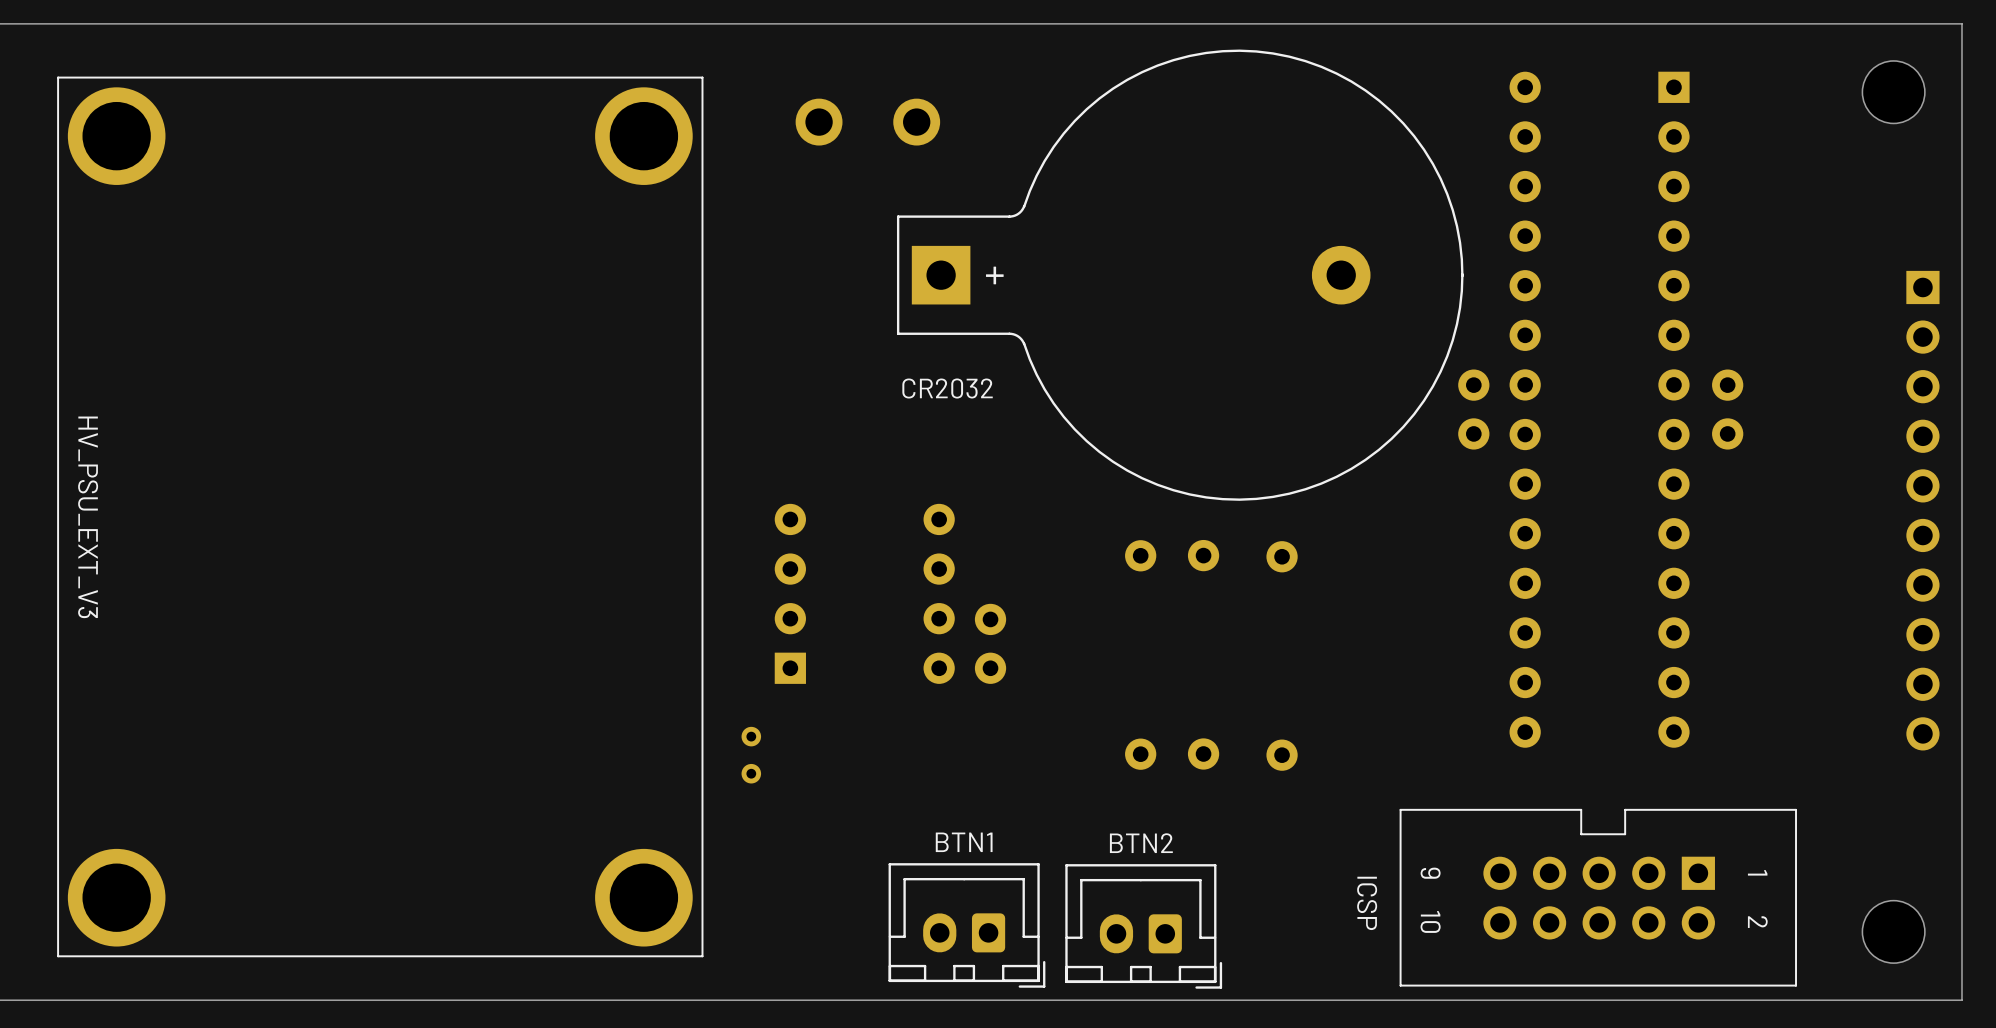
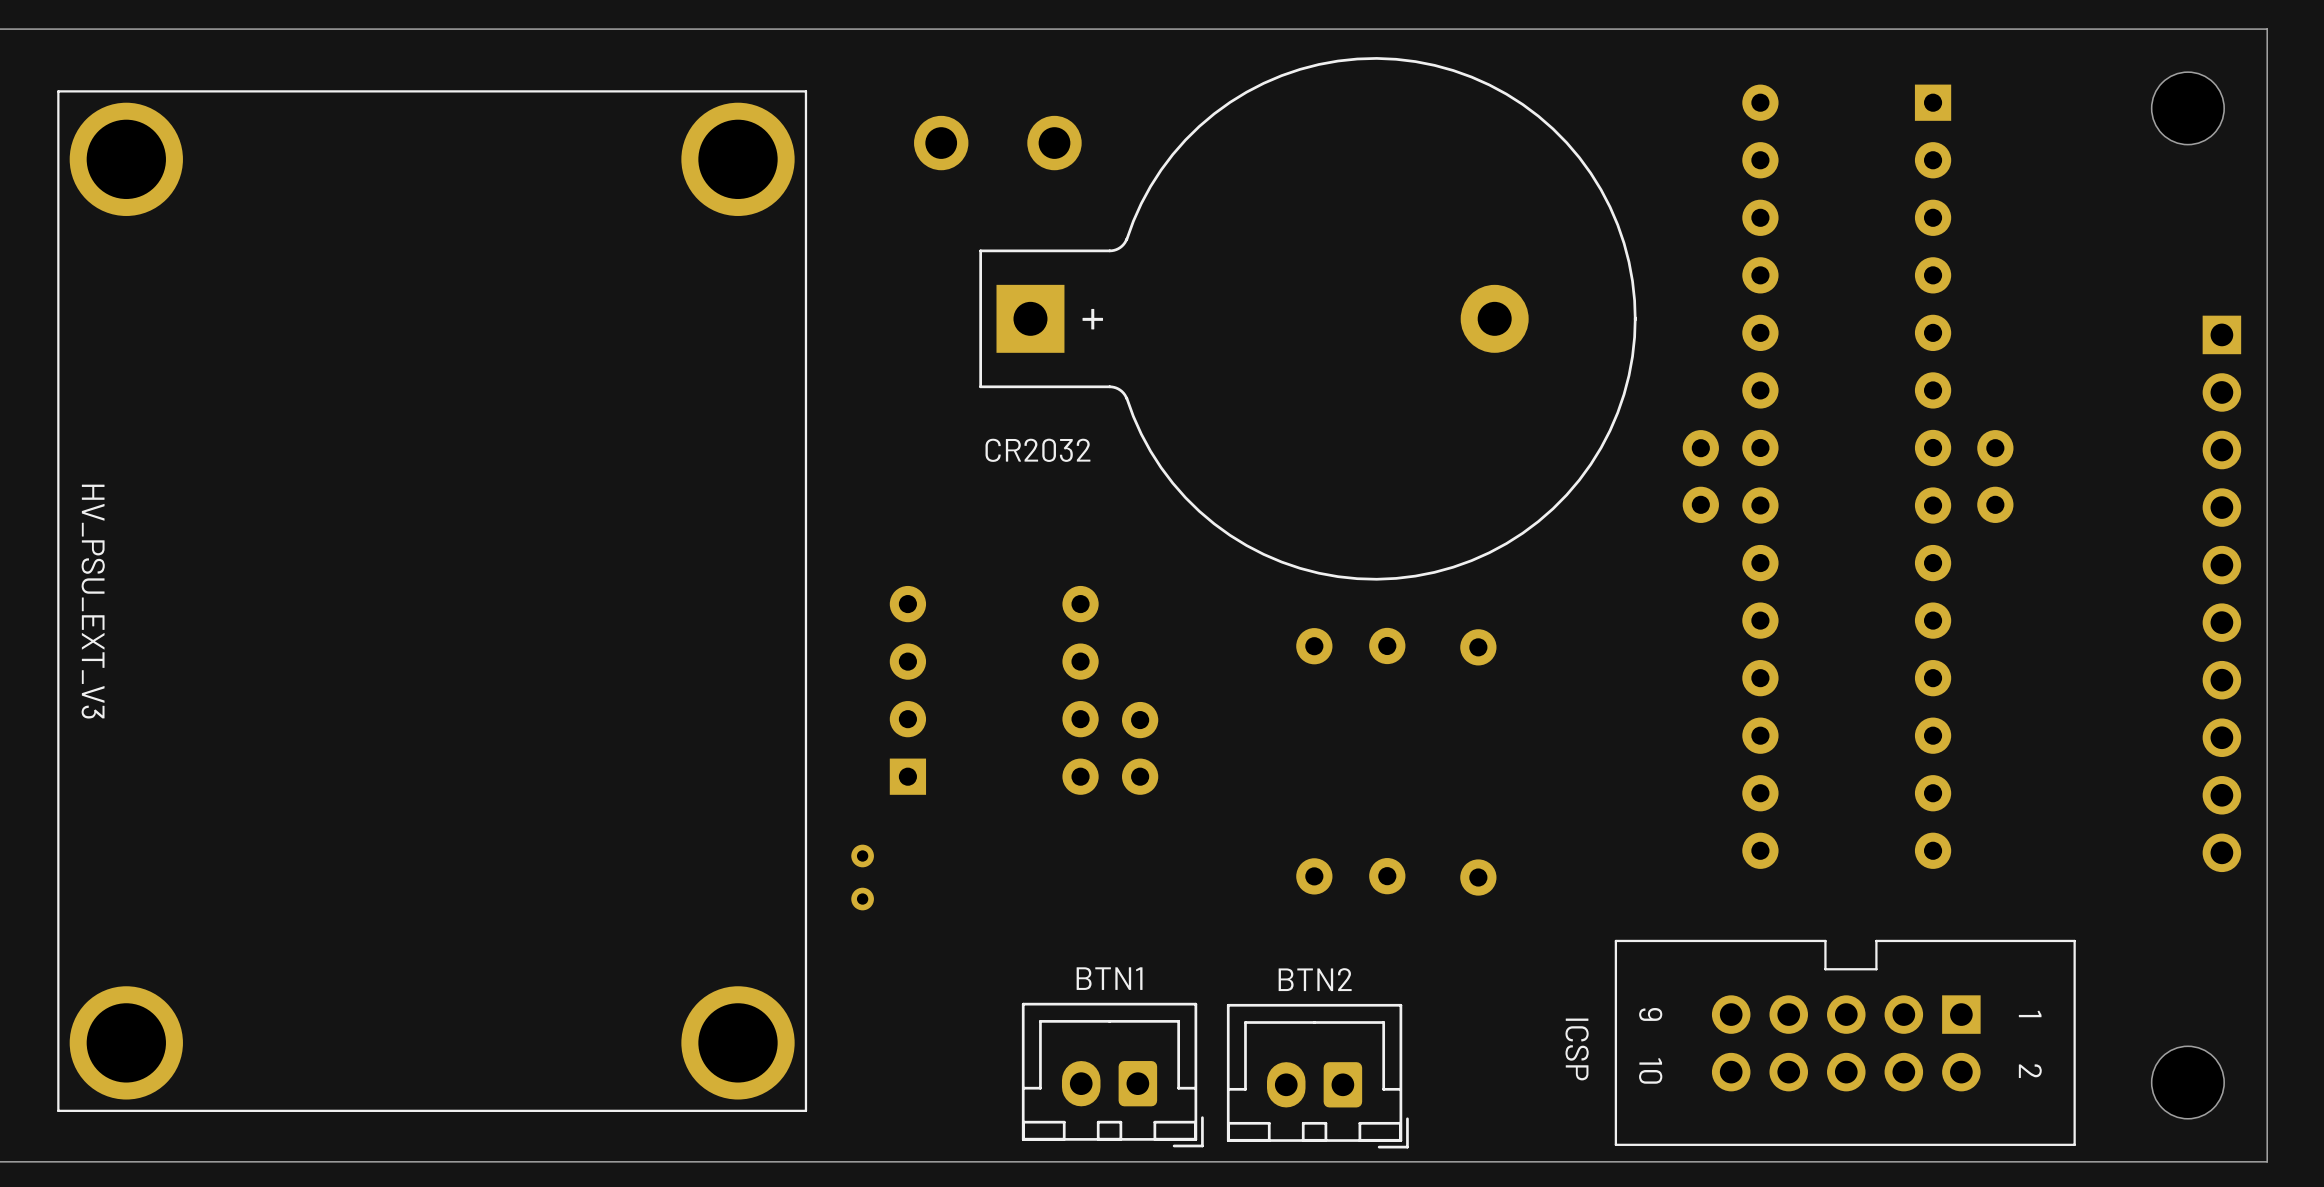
part position: (1180, 275) -> (1307, 318)

